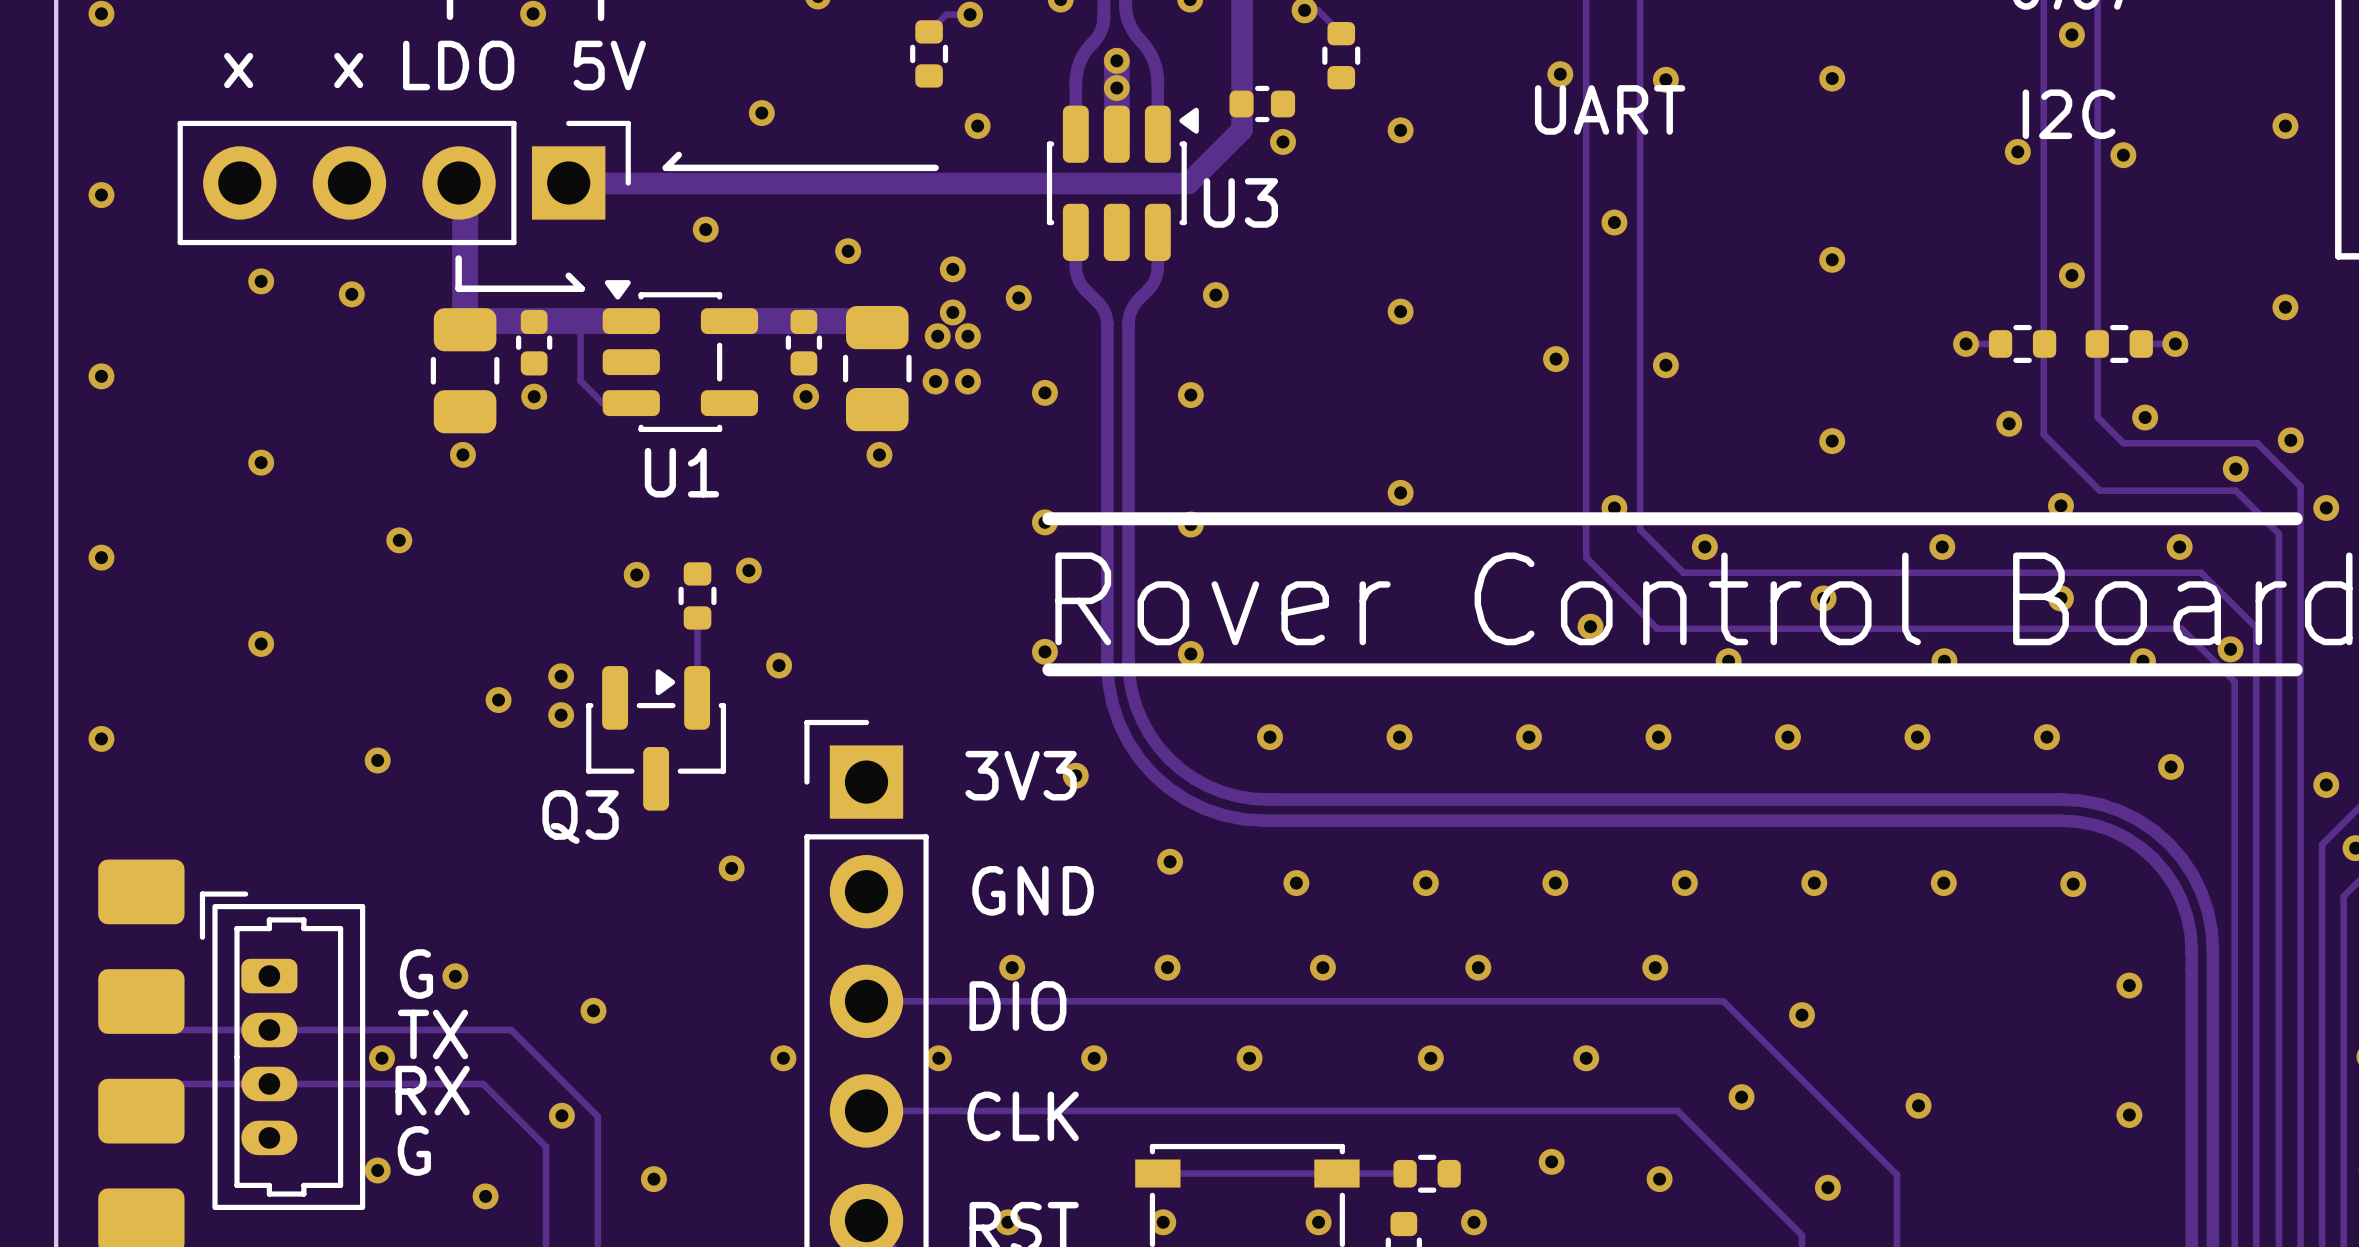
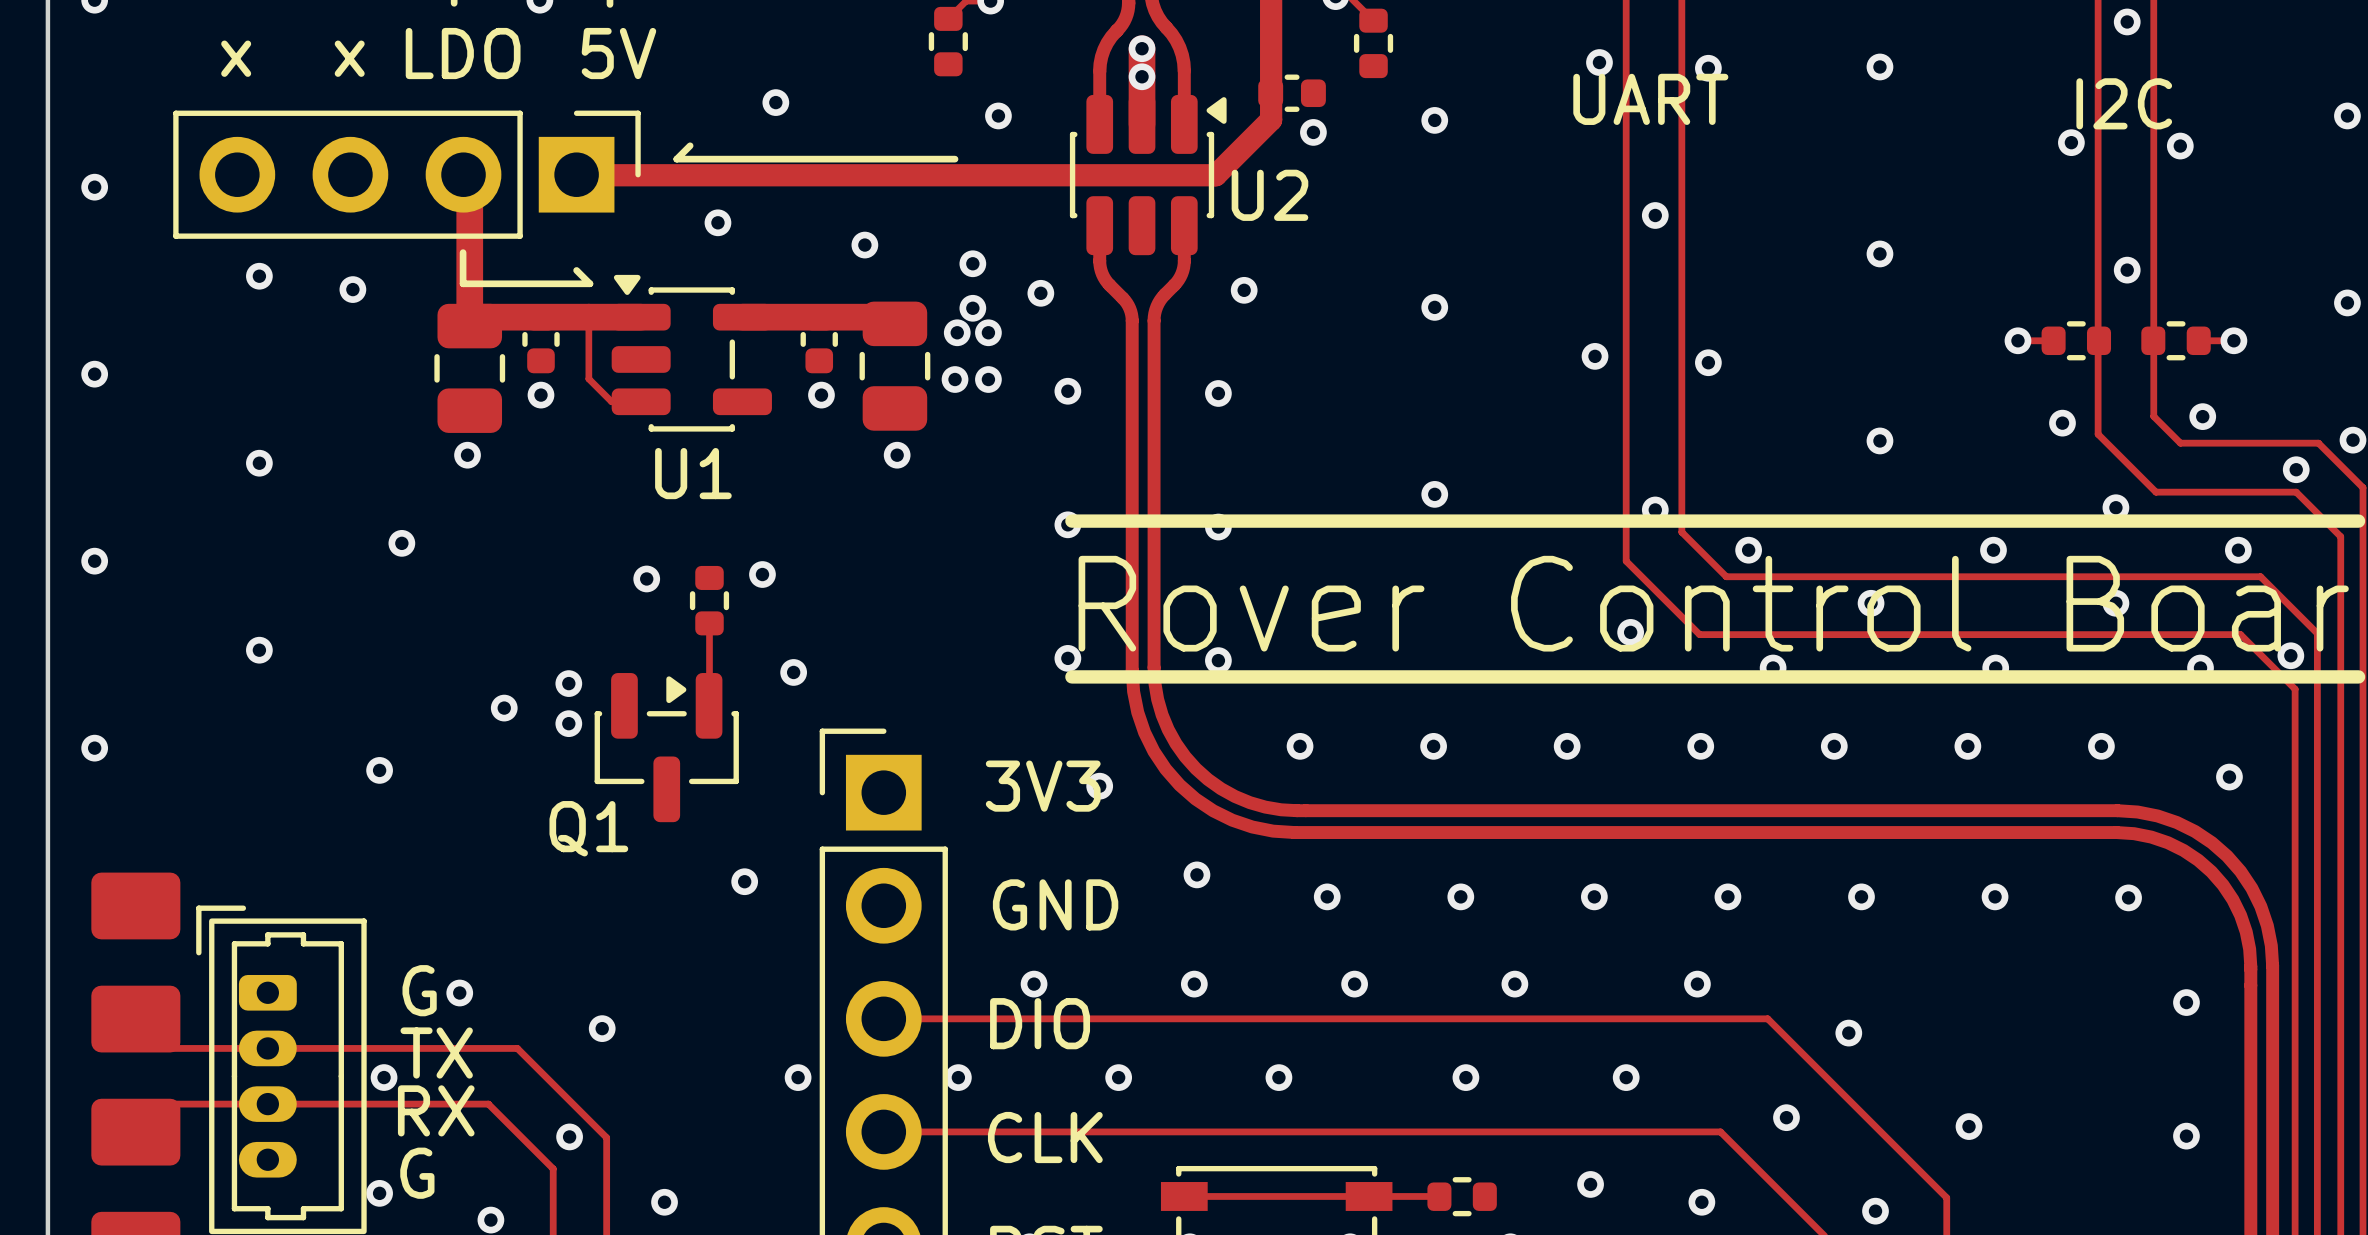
U3 name: U3 (1240, 202) -> U2 (1269, 195)
Q3 name: Q3 (580, 817) -> Q1 (588, 828)

